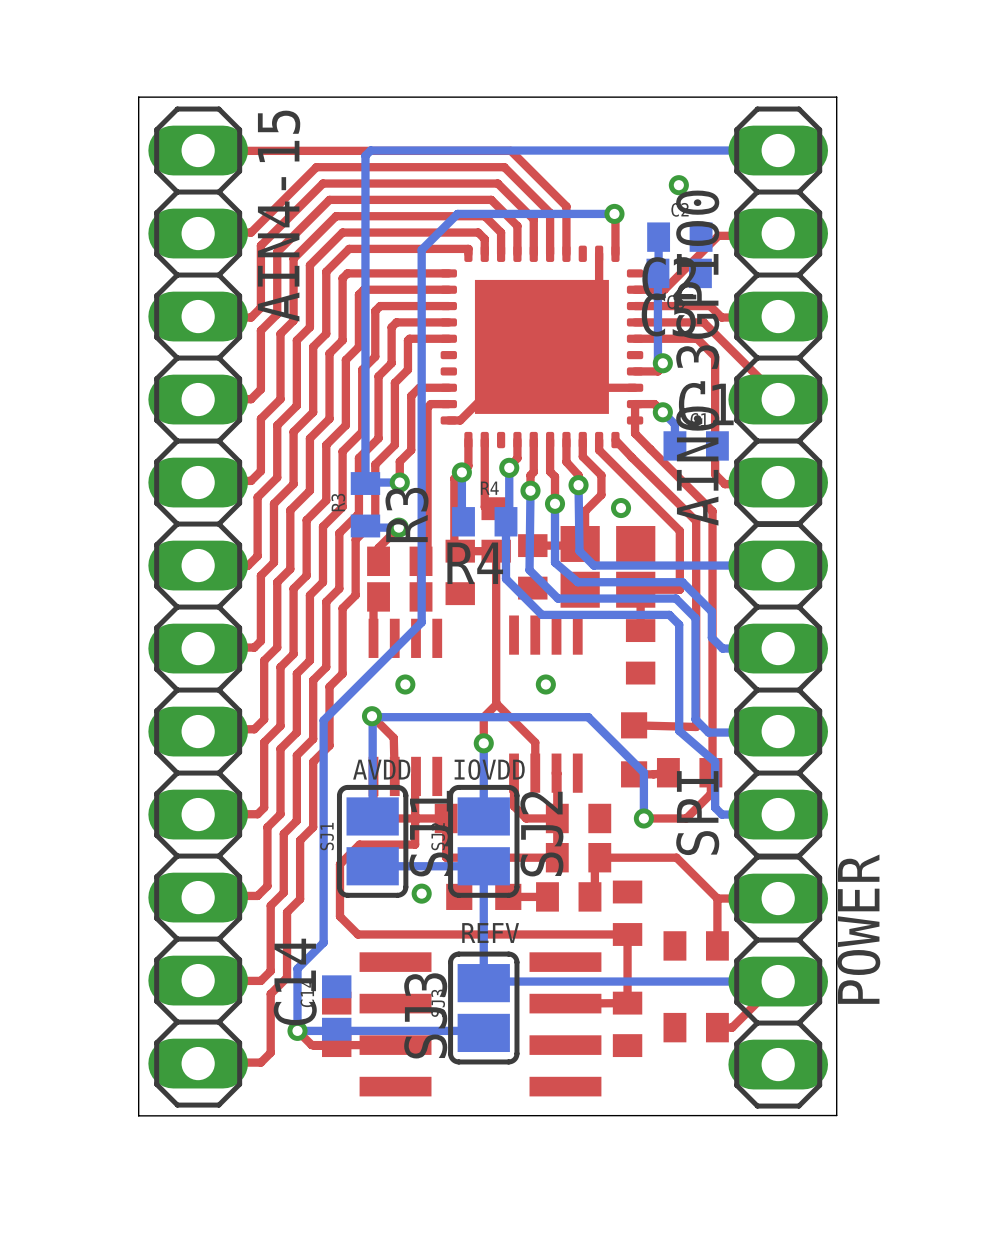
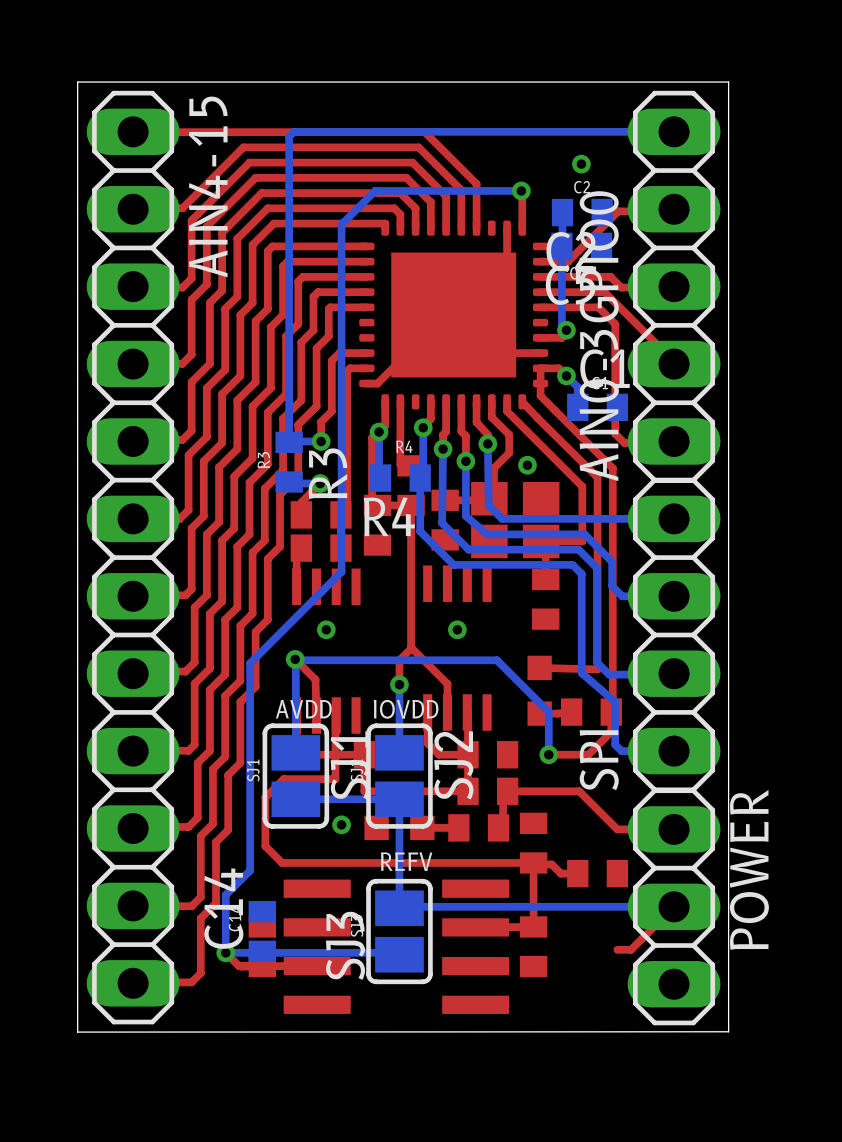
top track: (717, 898) (717, 945) -> none
top track: none -> (533, 862) (532, 864) (551, 864) (560, 873) (577, 873)
part: (696, 1027) -> none

